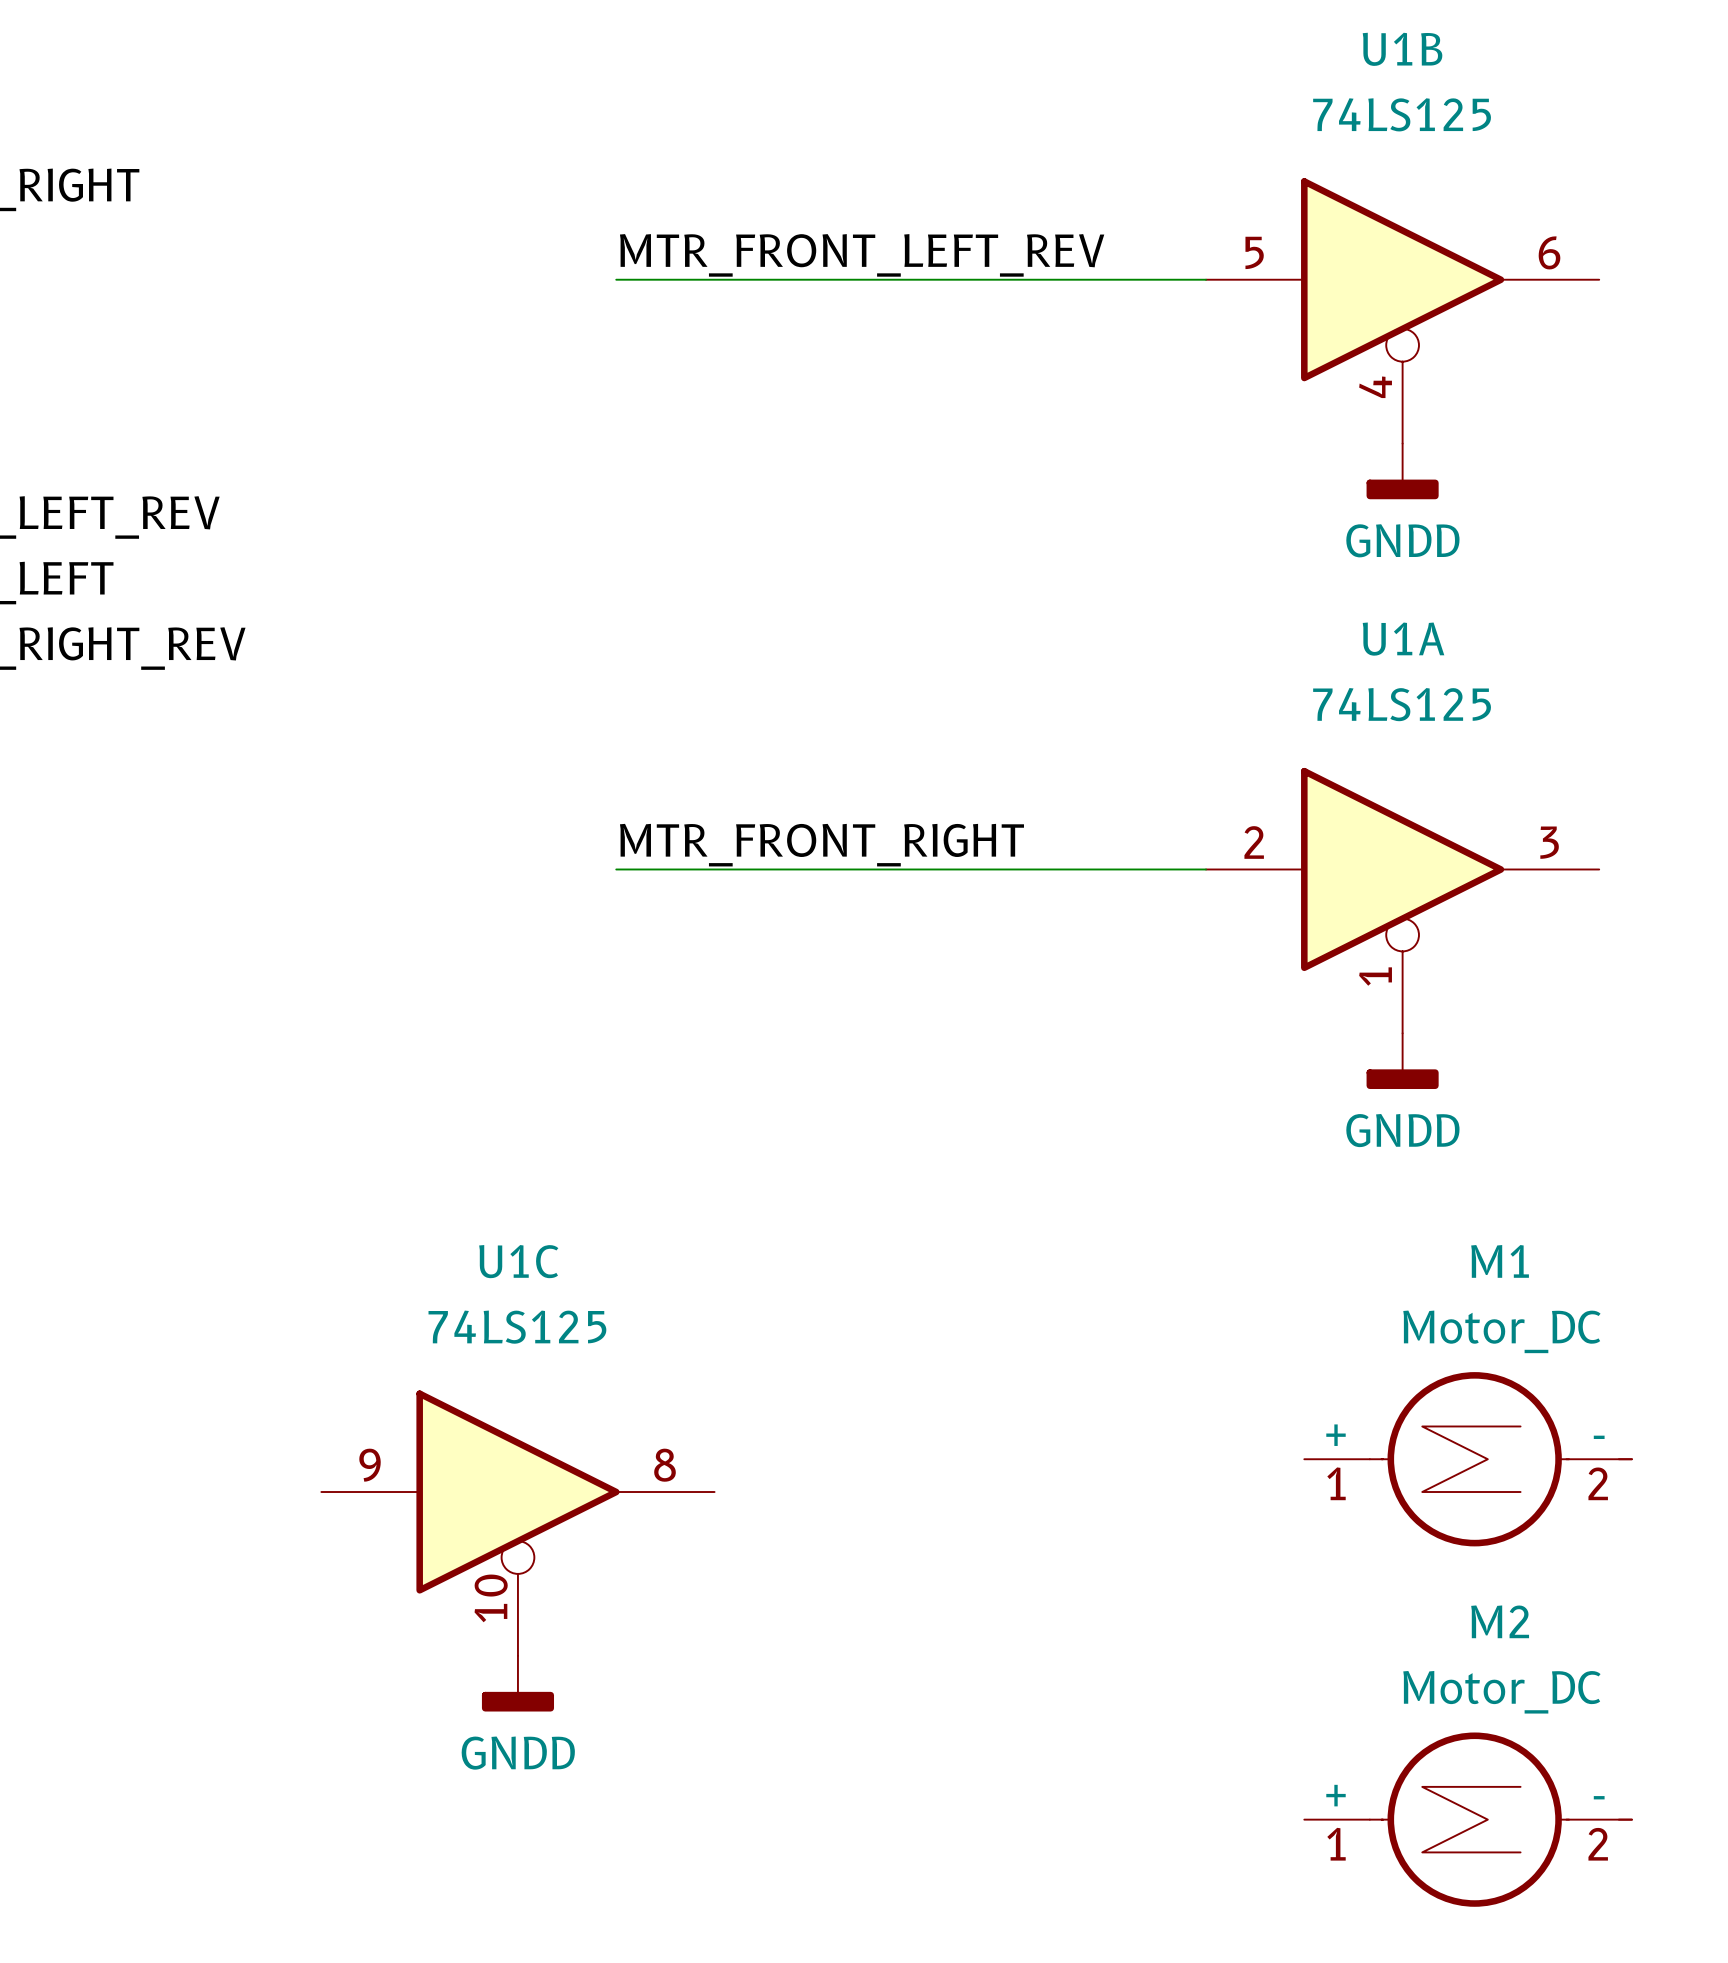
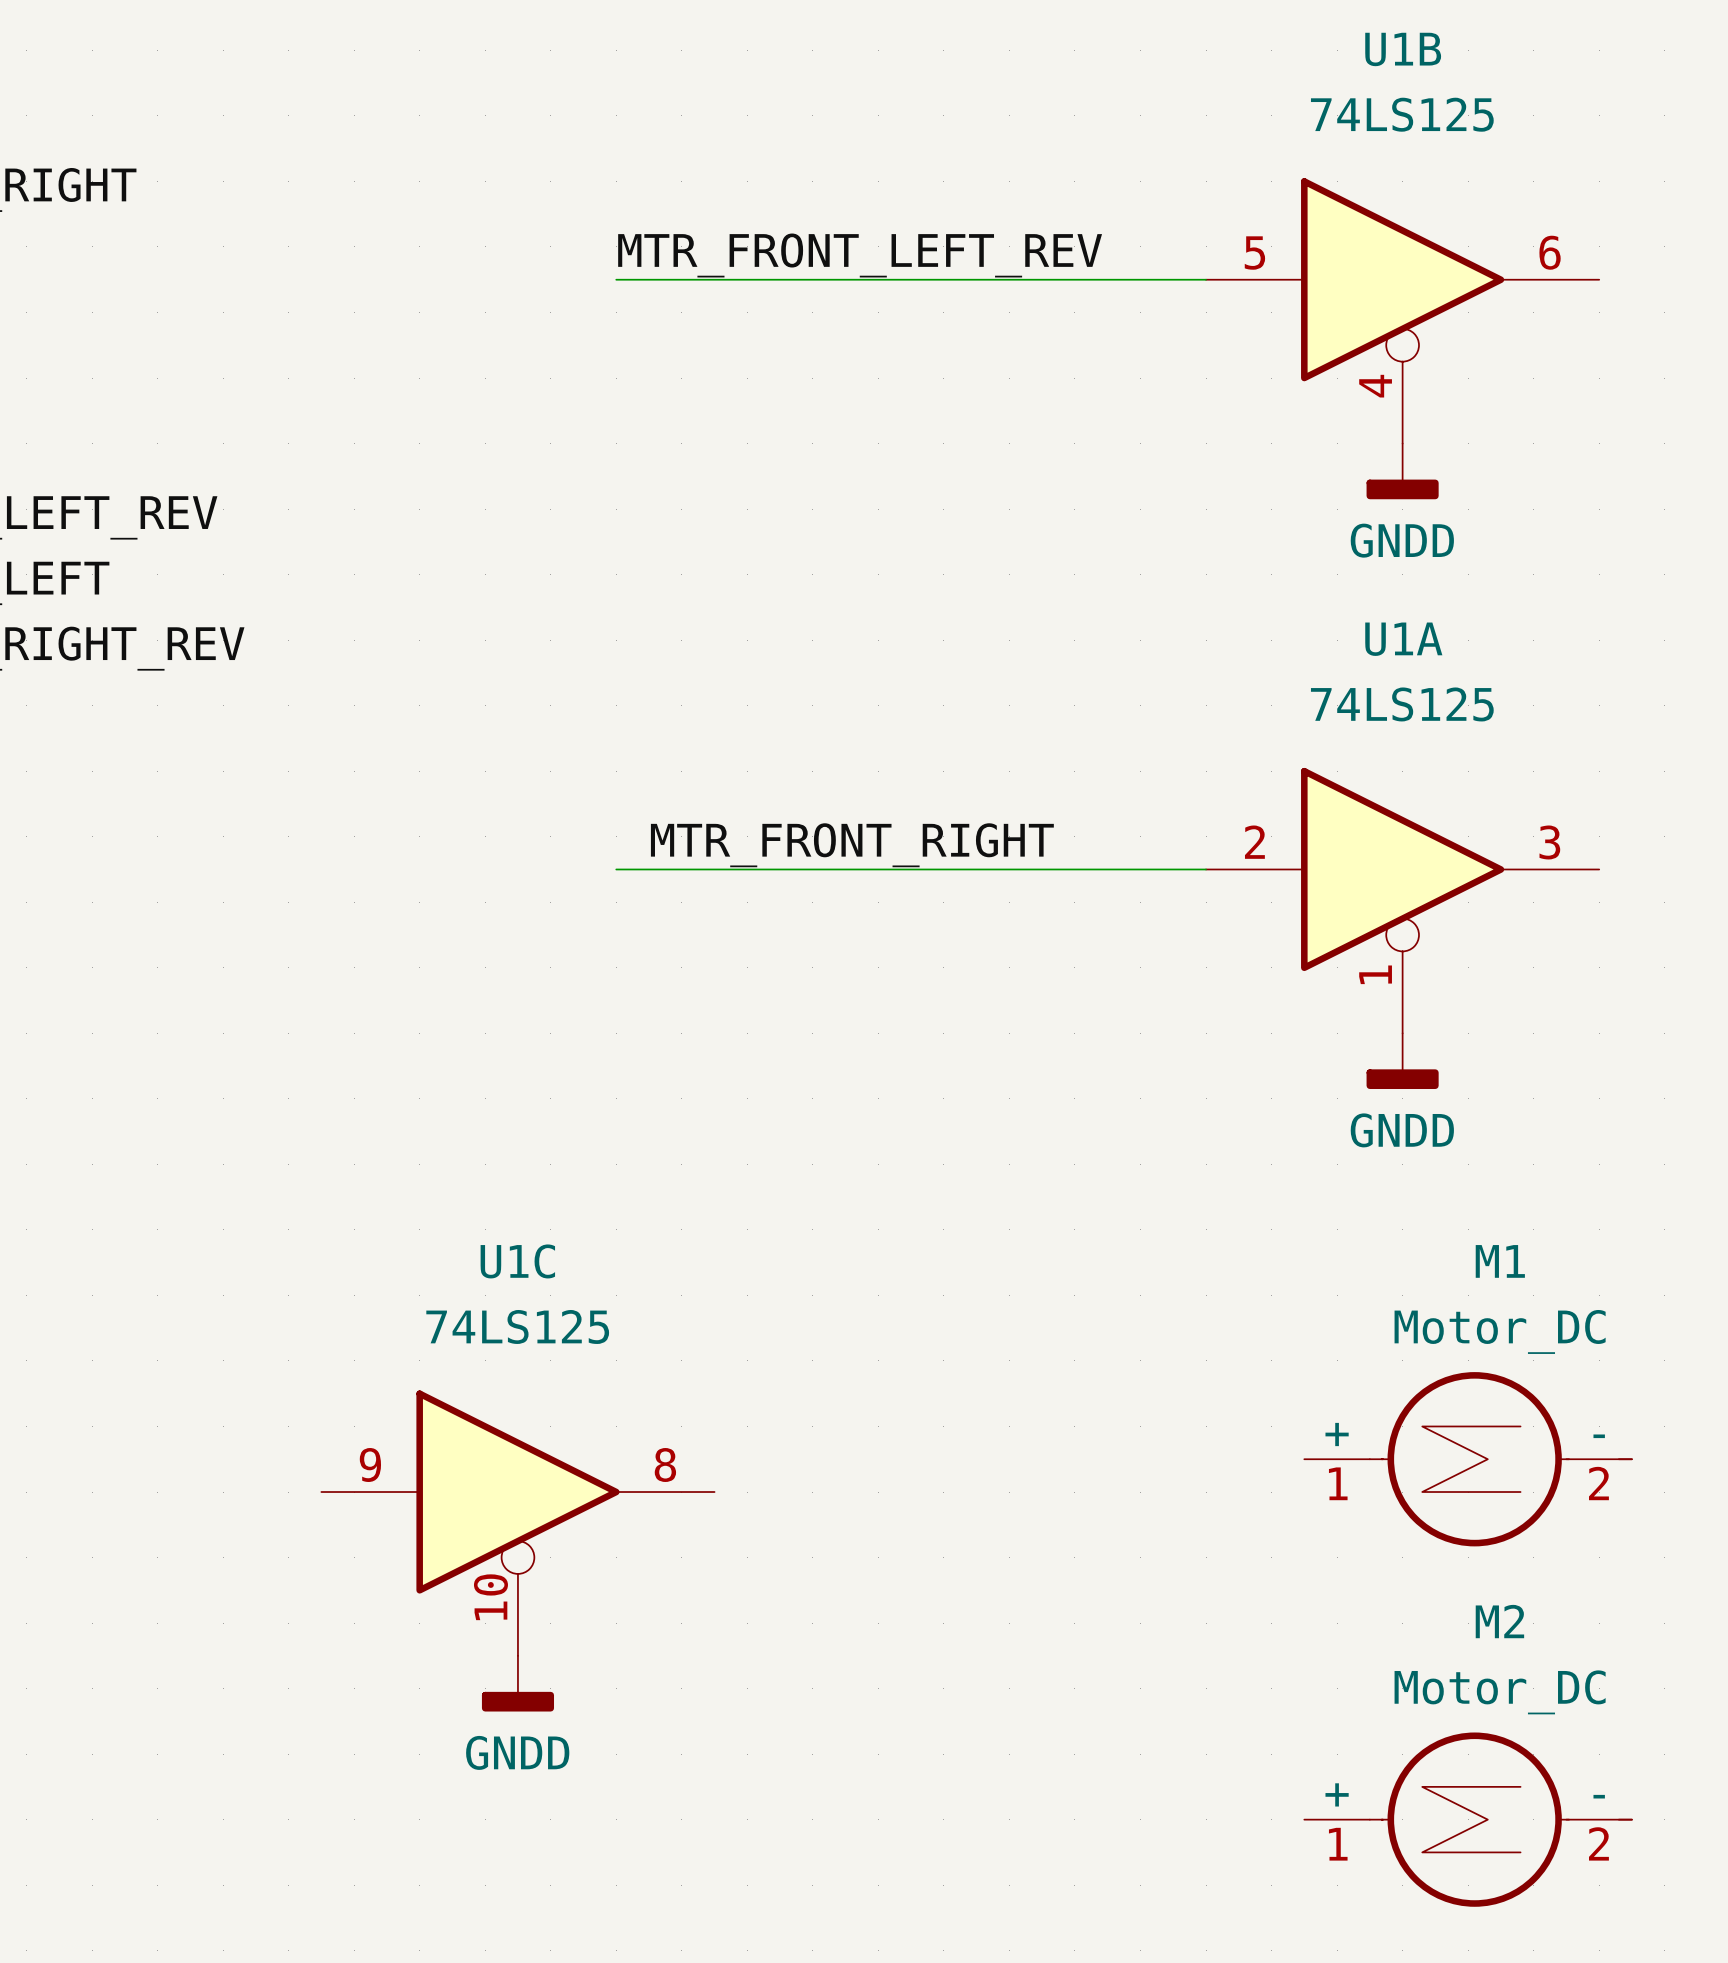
label position: MTR_FRONT_RIGHT (821, 845) -> MTR_FRONT_RIGHT (852, 845)

